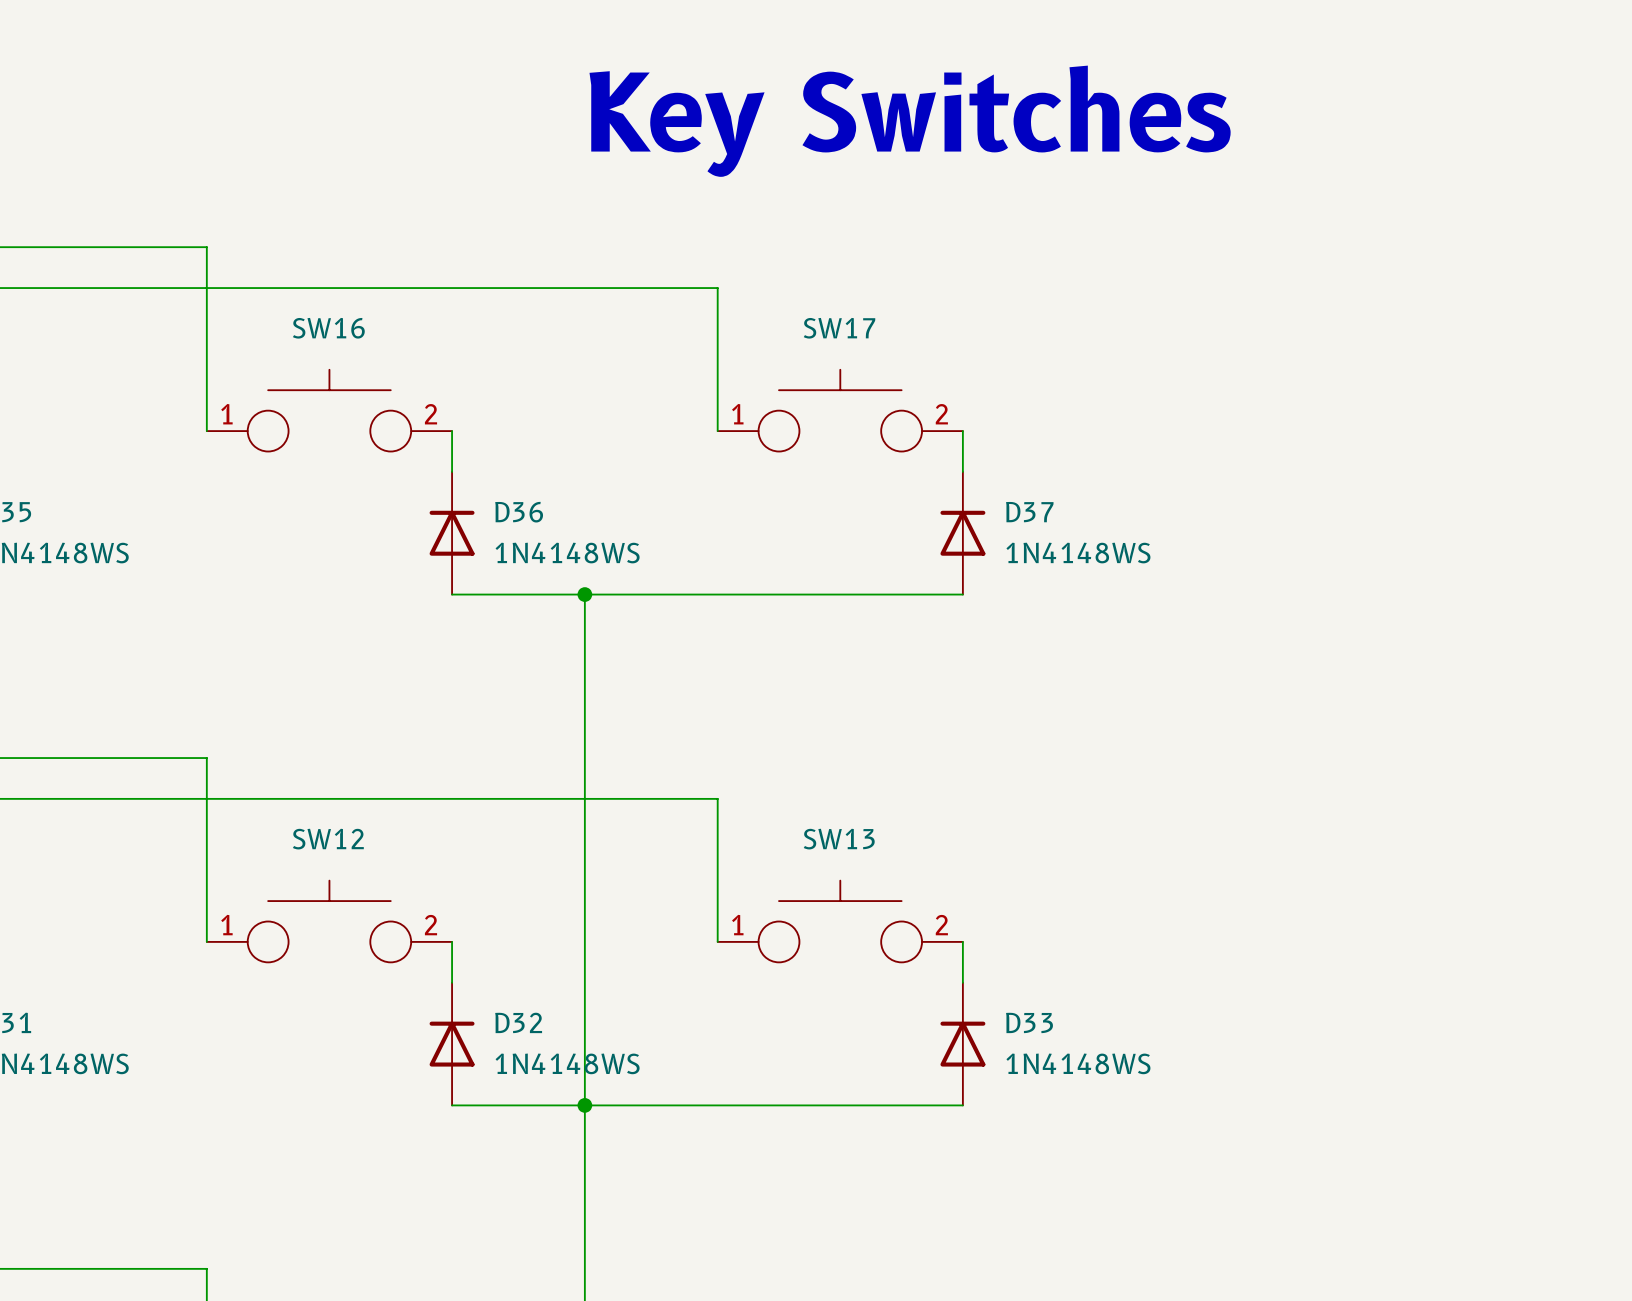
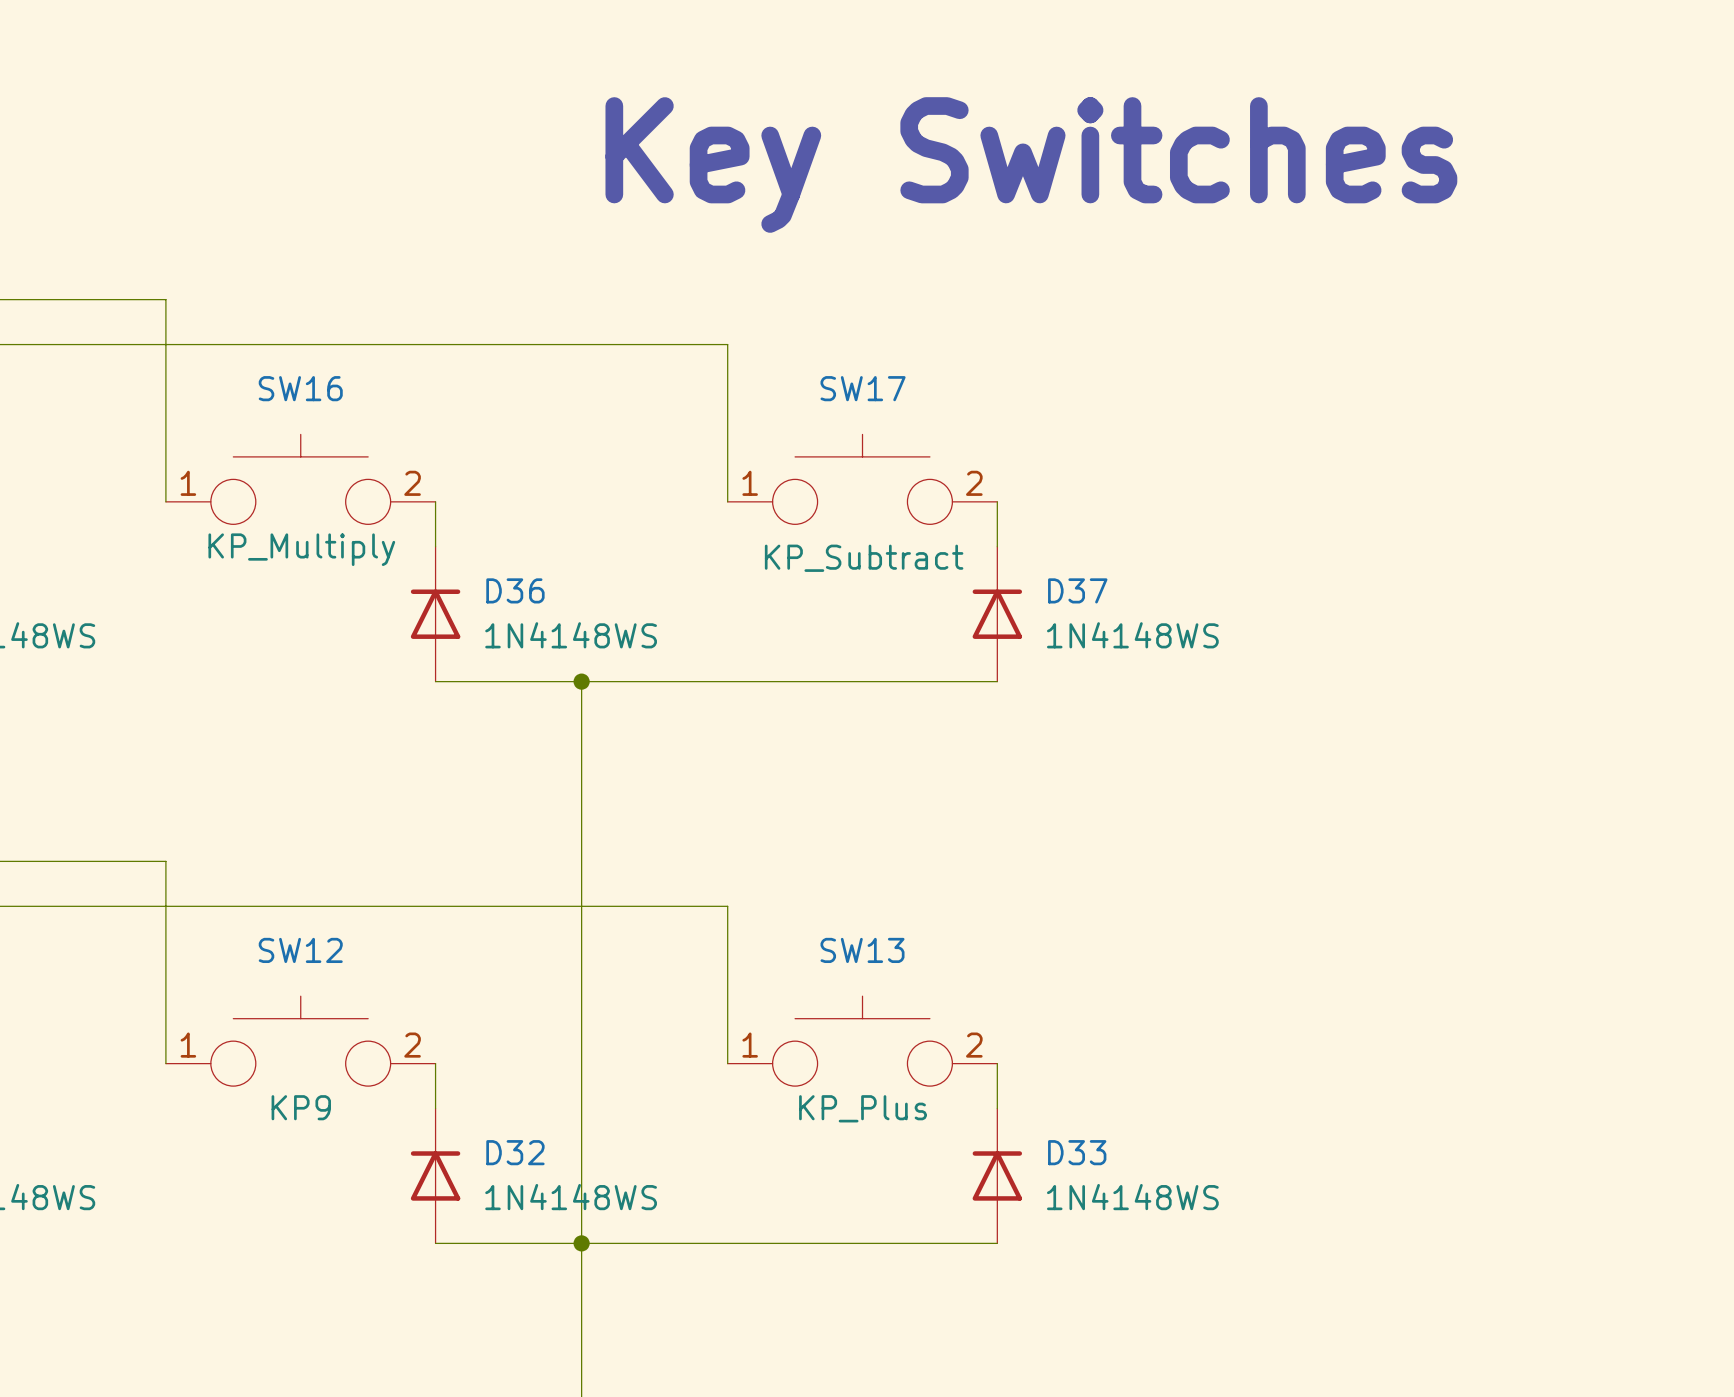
SW16 value: none -> KP_Multiply (301, 549)
SW17 value: none -> KP_Subtract (864, 558)
SW12 value: none -> KP9 (301, 1107)
SW13 value: none -> KP_Plus (863, 1108)

